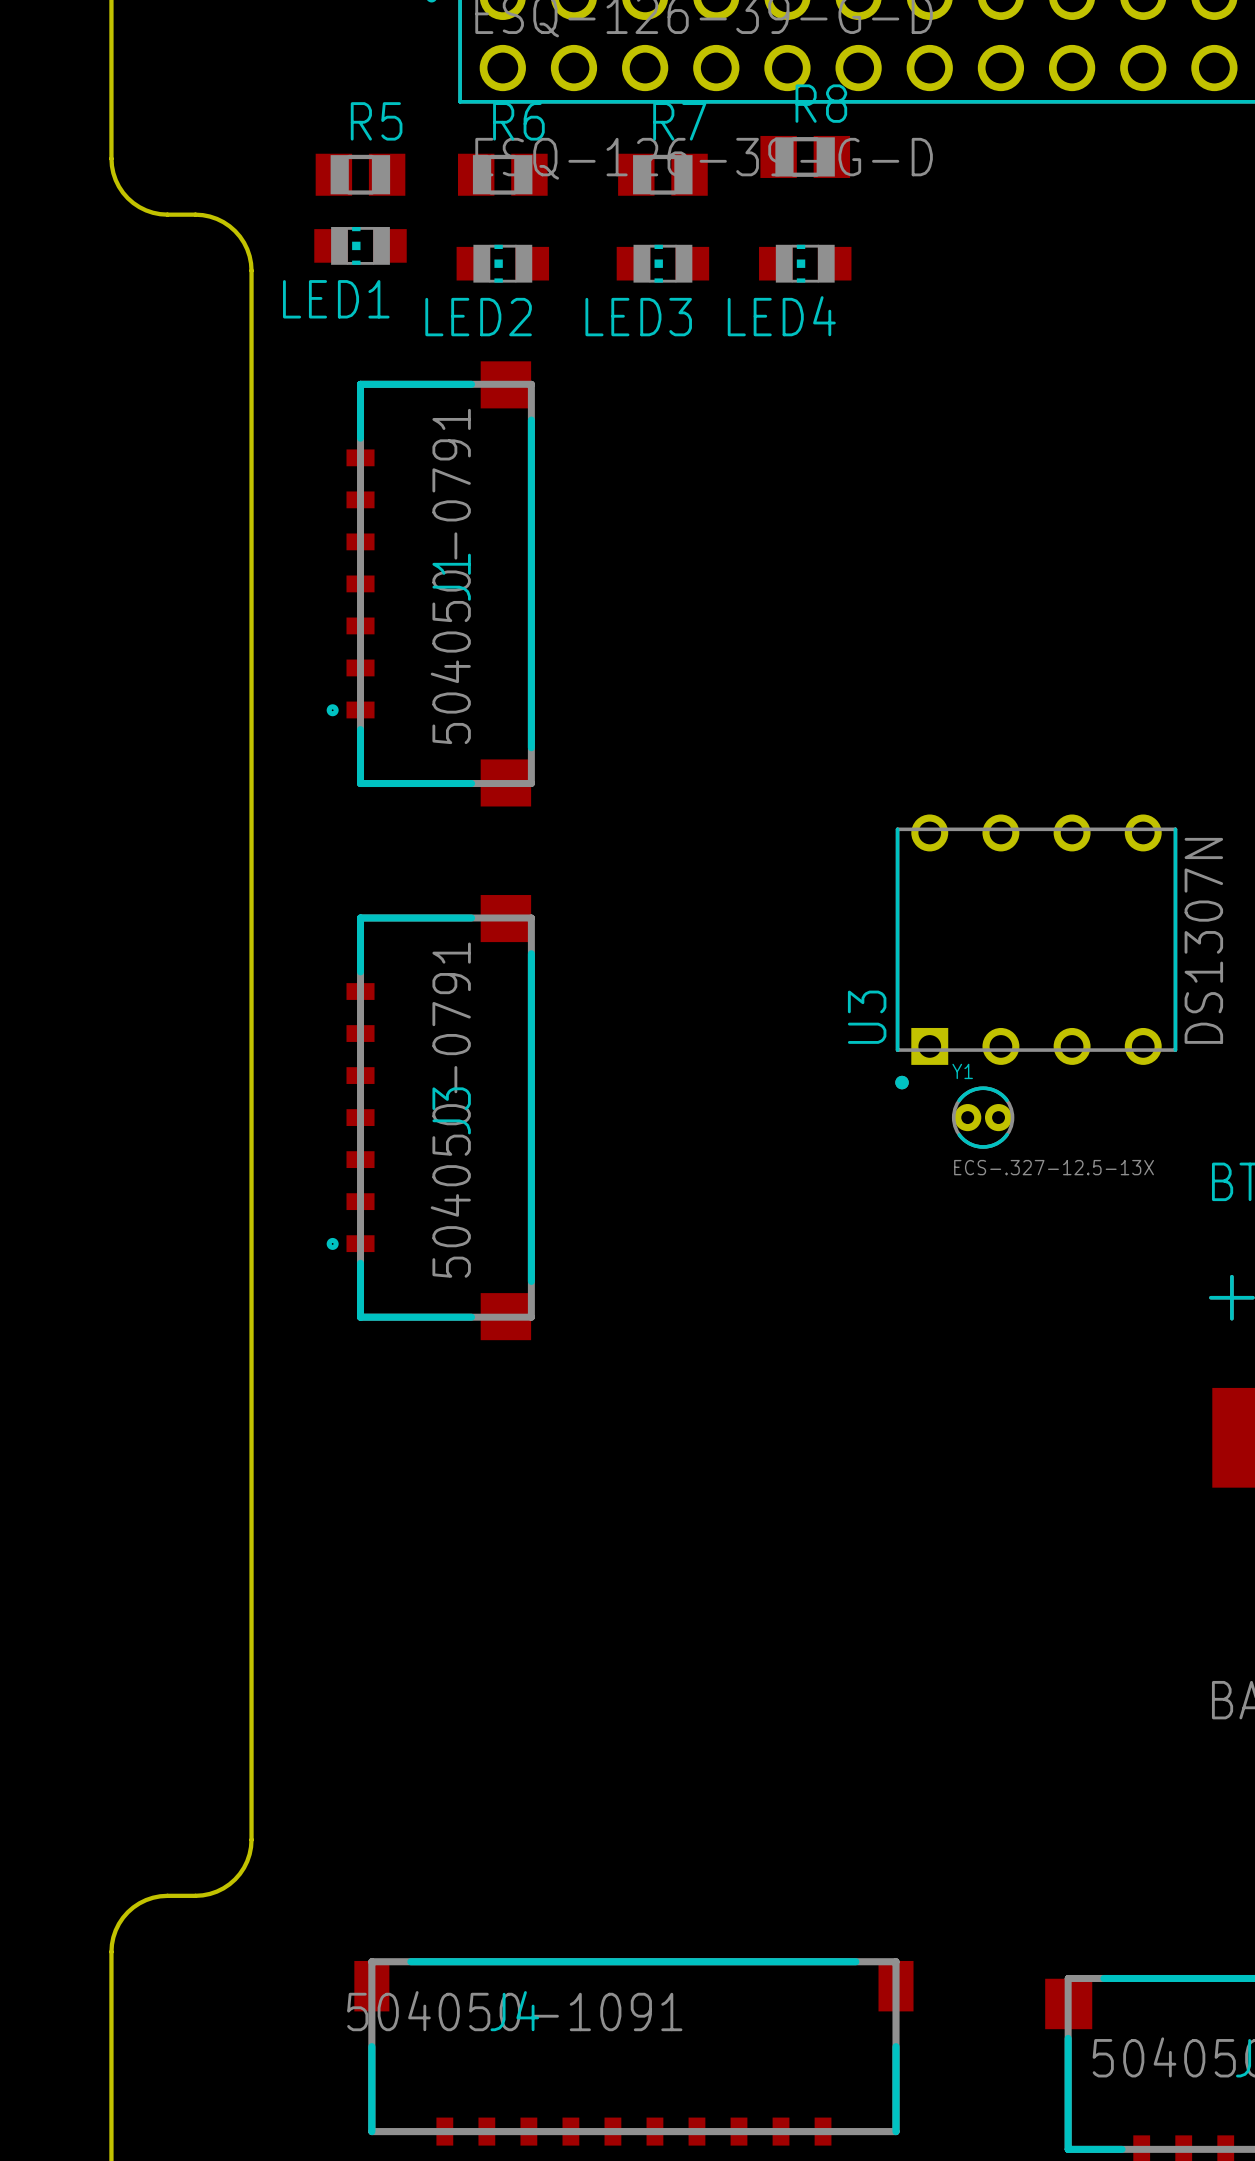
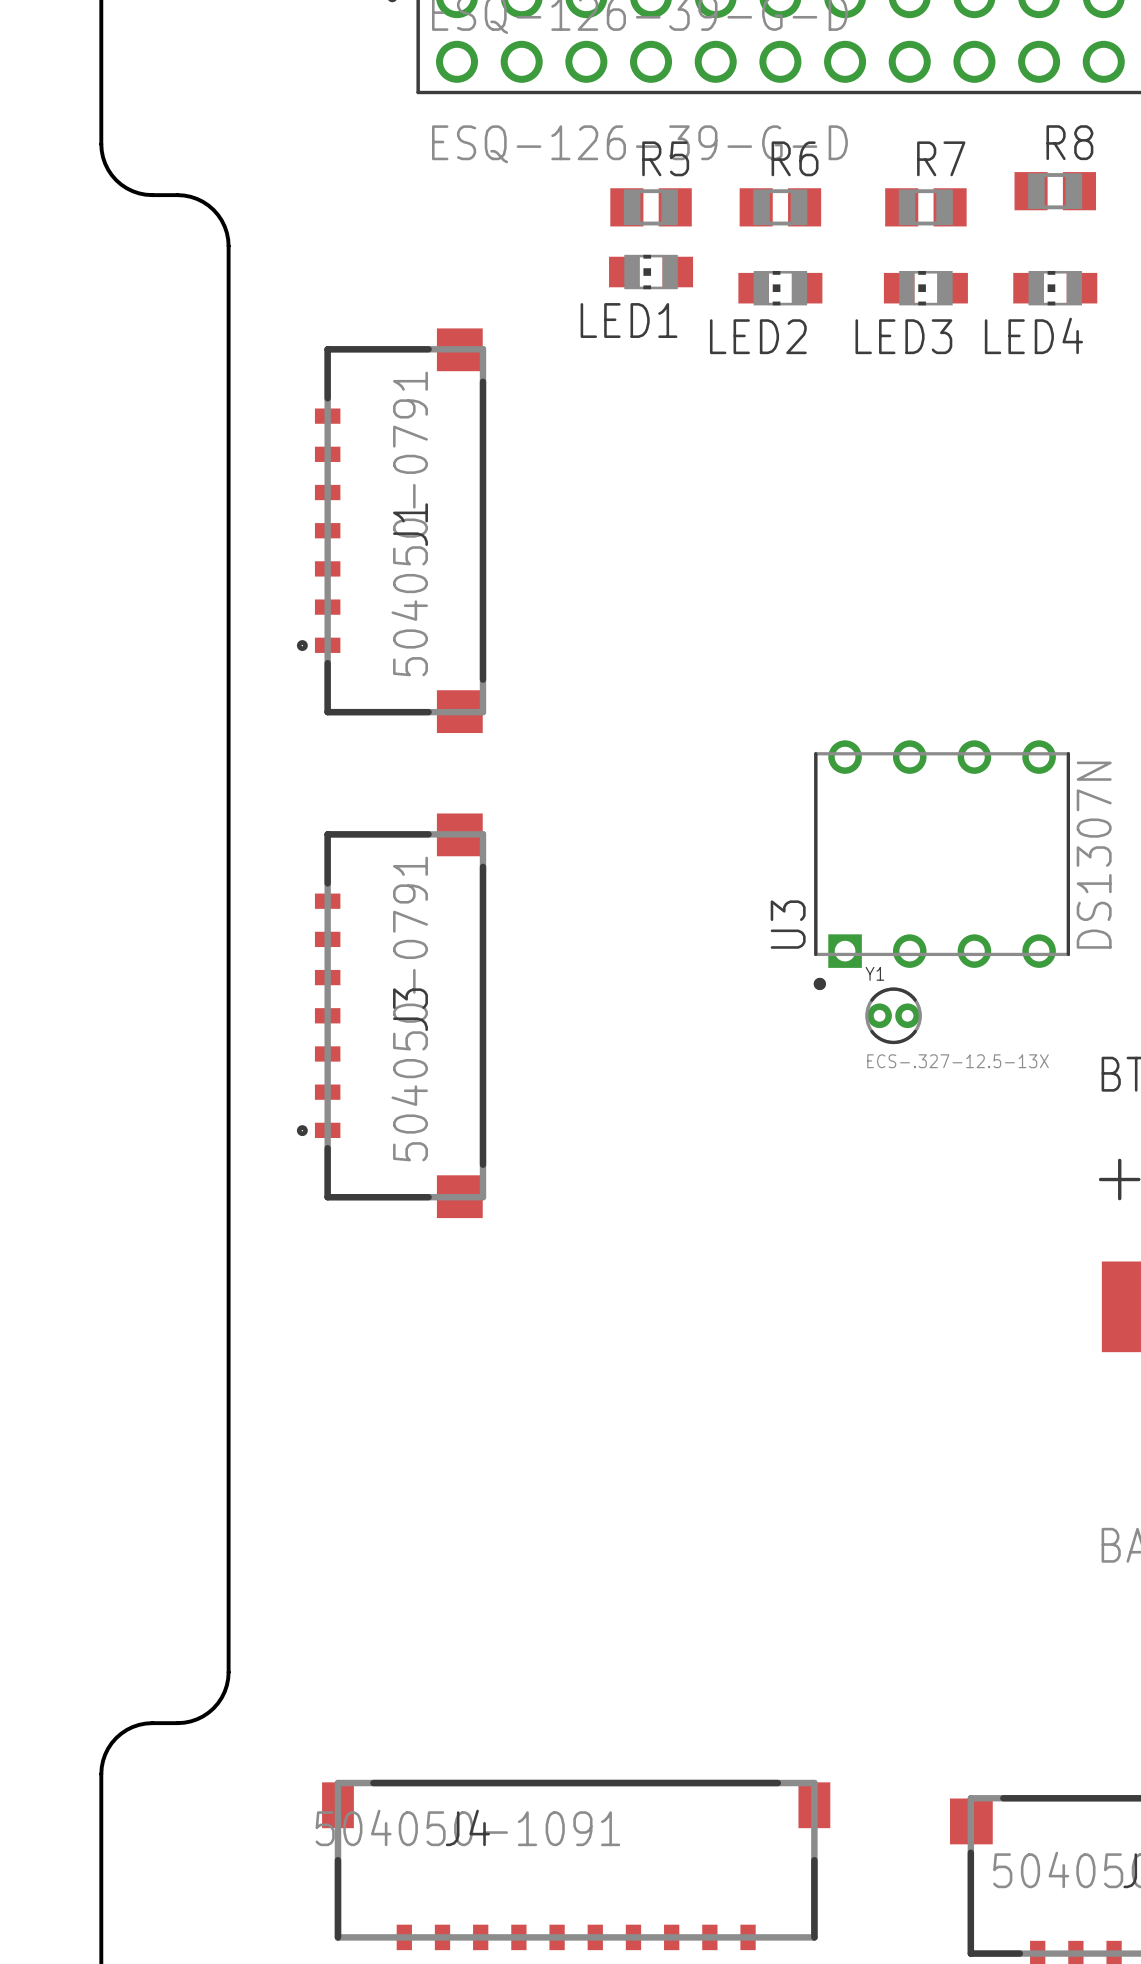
R8 position: (805, 156) -> (1055, 191)
R5 position: (360, 174) -> (651, 207)
R6 position: (502, 174) -> (780, 207)
R7 position: (662, 174) -> (925, 207)
LED1 position: (360, 245) -> (651, 272)
LED2 position: (502, 263) -> (780, 288)
LED3 position: (662, 263) -> (925, 288)
LED4 position: (805, 263) -> (1055, 288)

